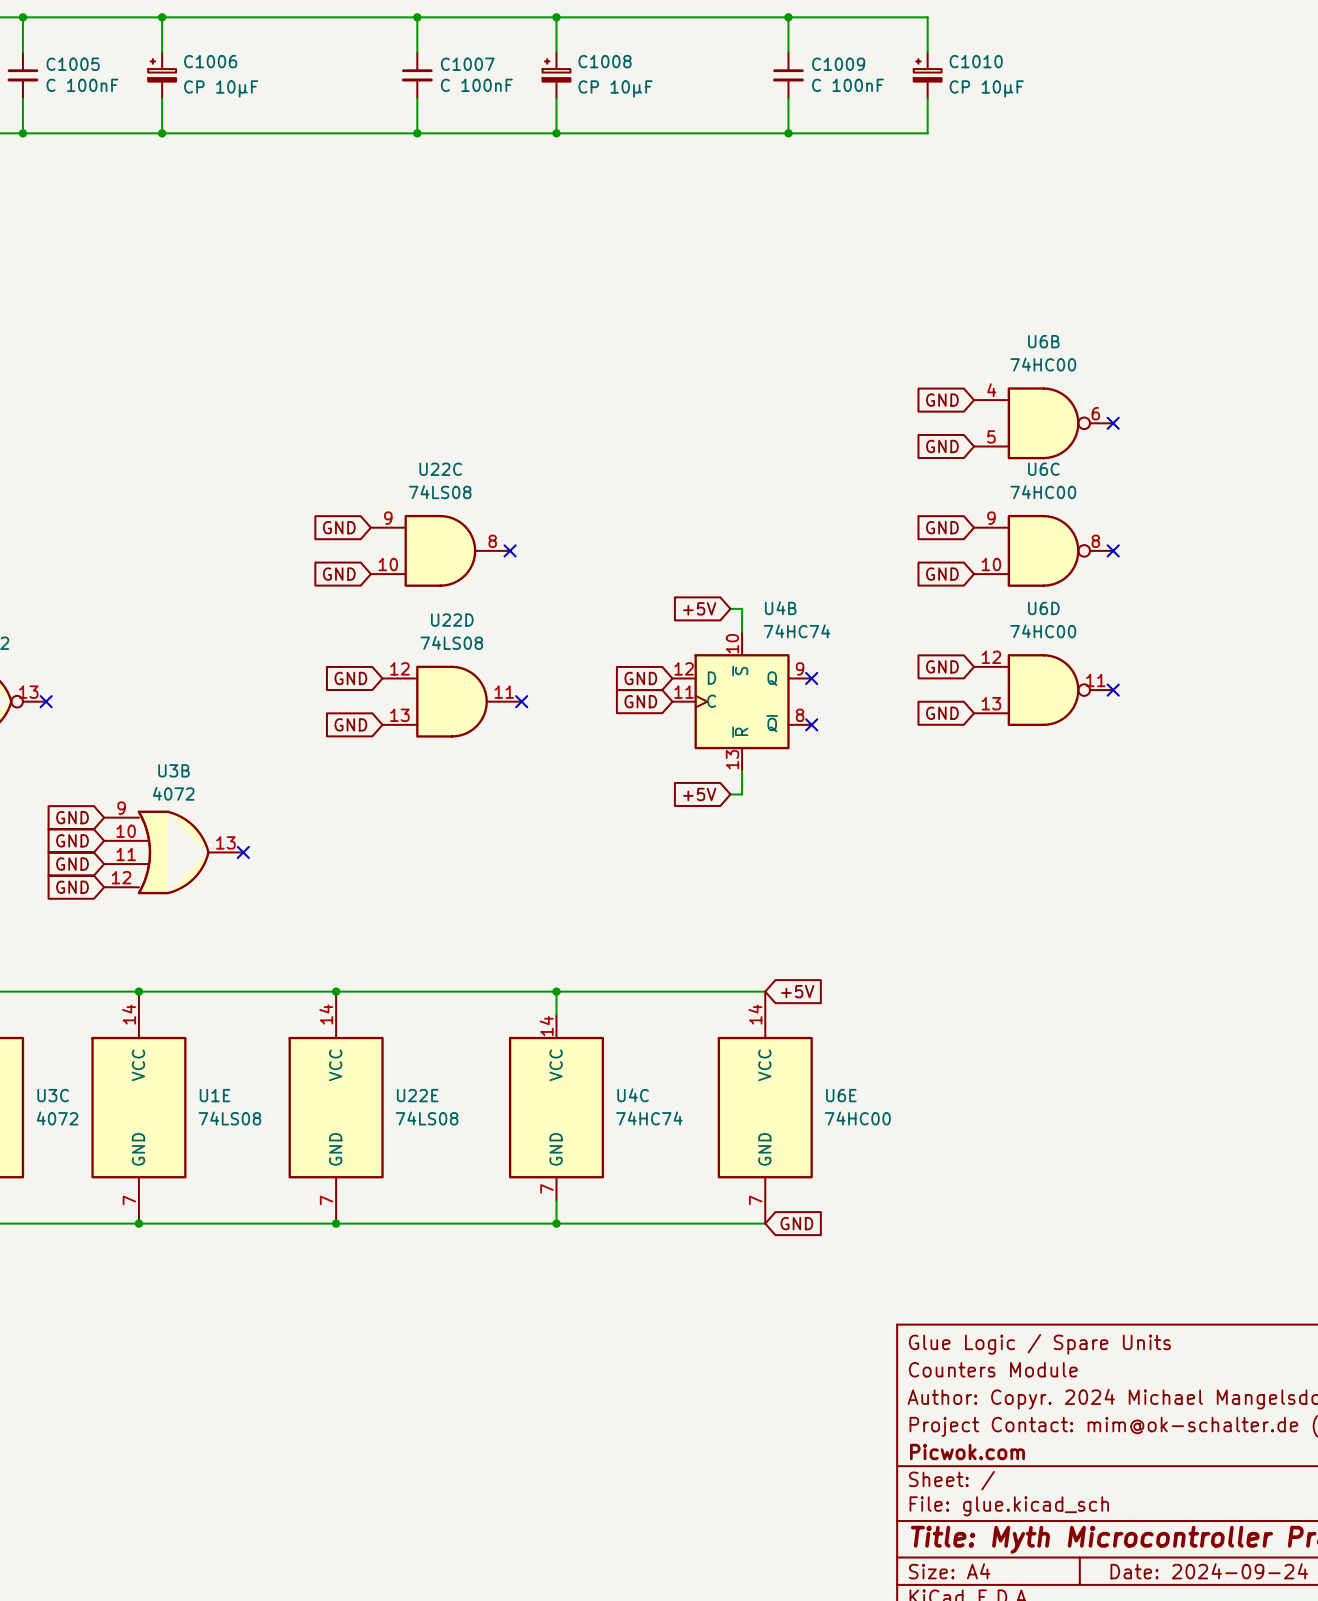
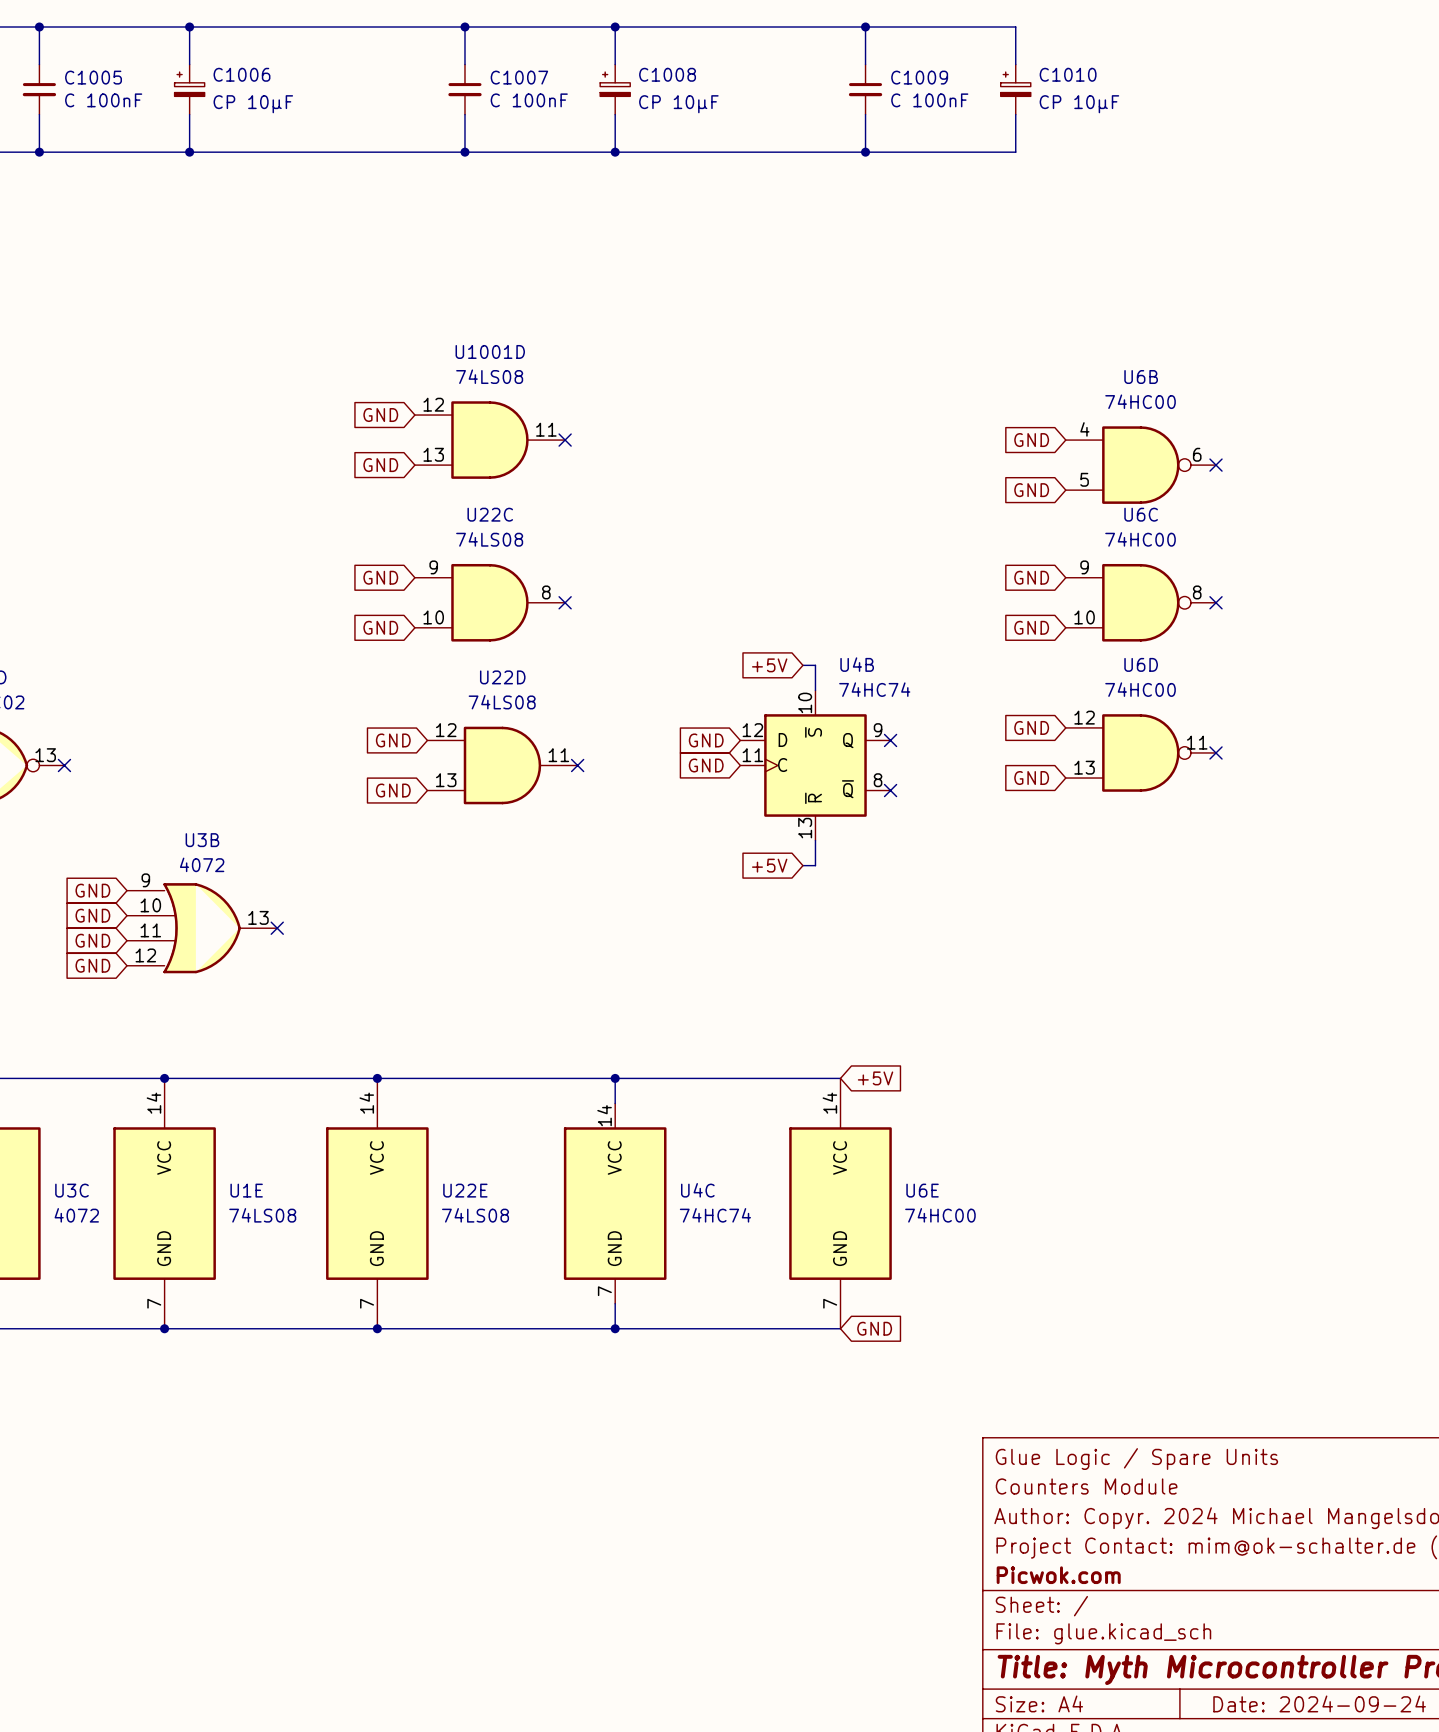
global label: none -> GND (380, 415)
U1001D: none -> 74LS08 (490, 440)
no-connect mark: none -> (565, 440)
global label: none -> GND (380, 465)

